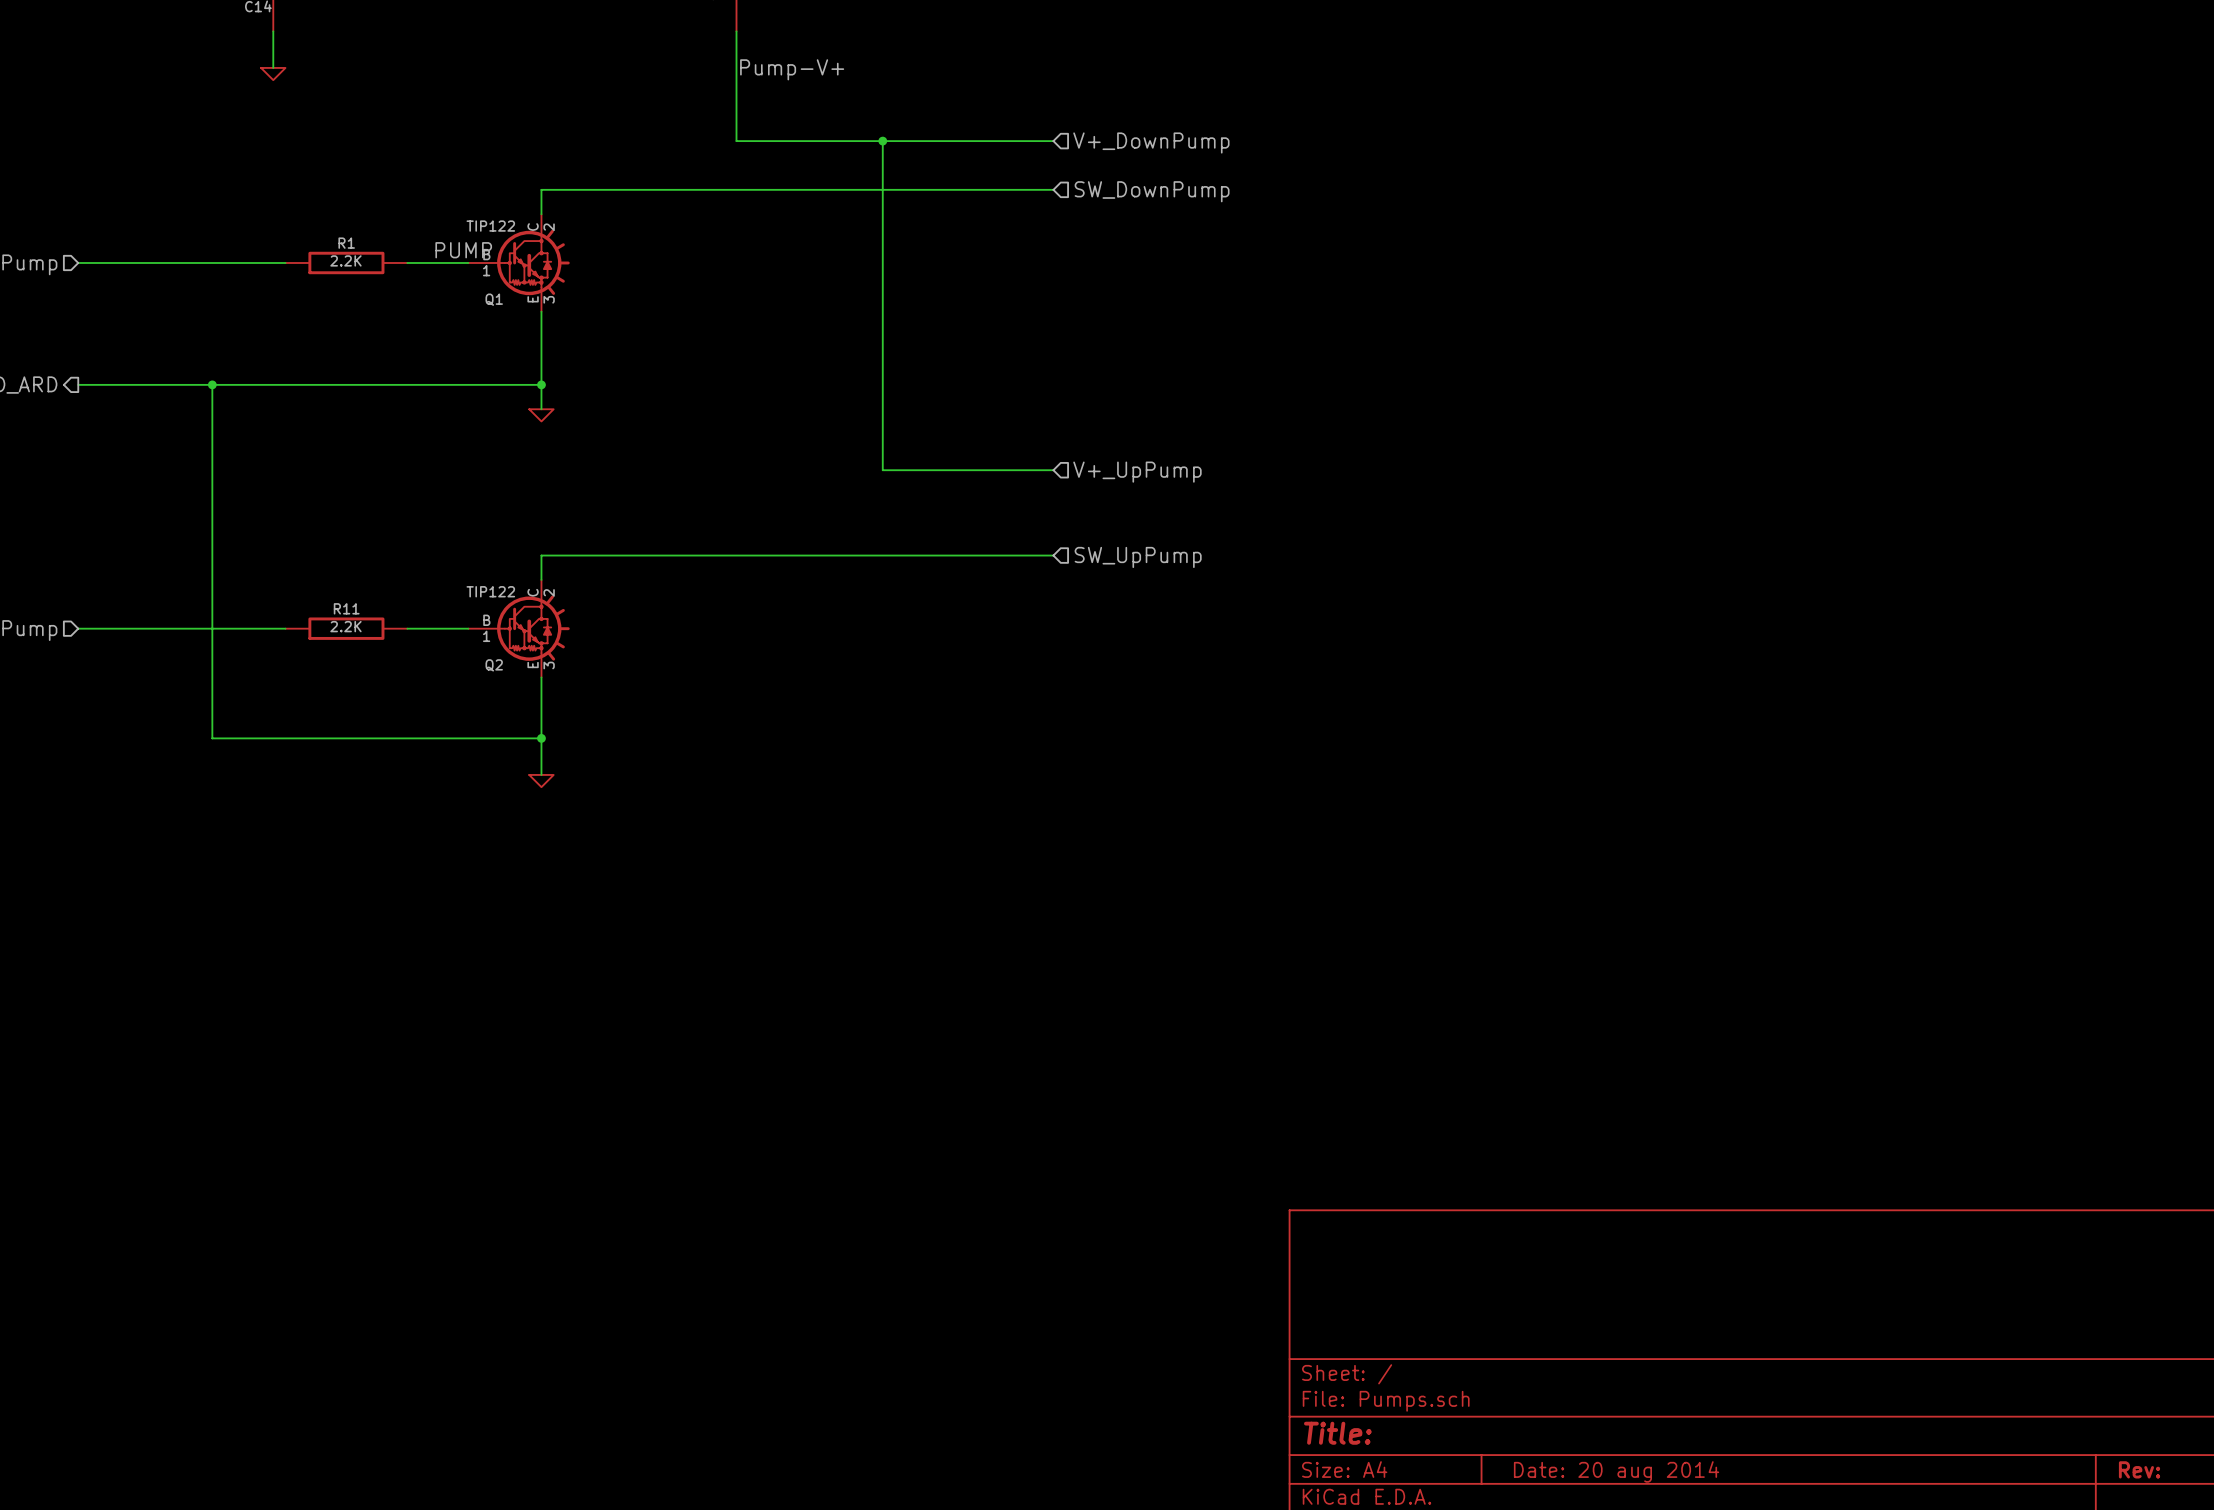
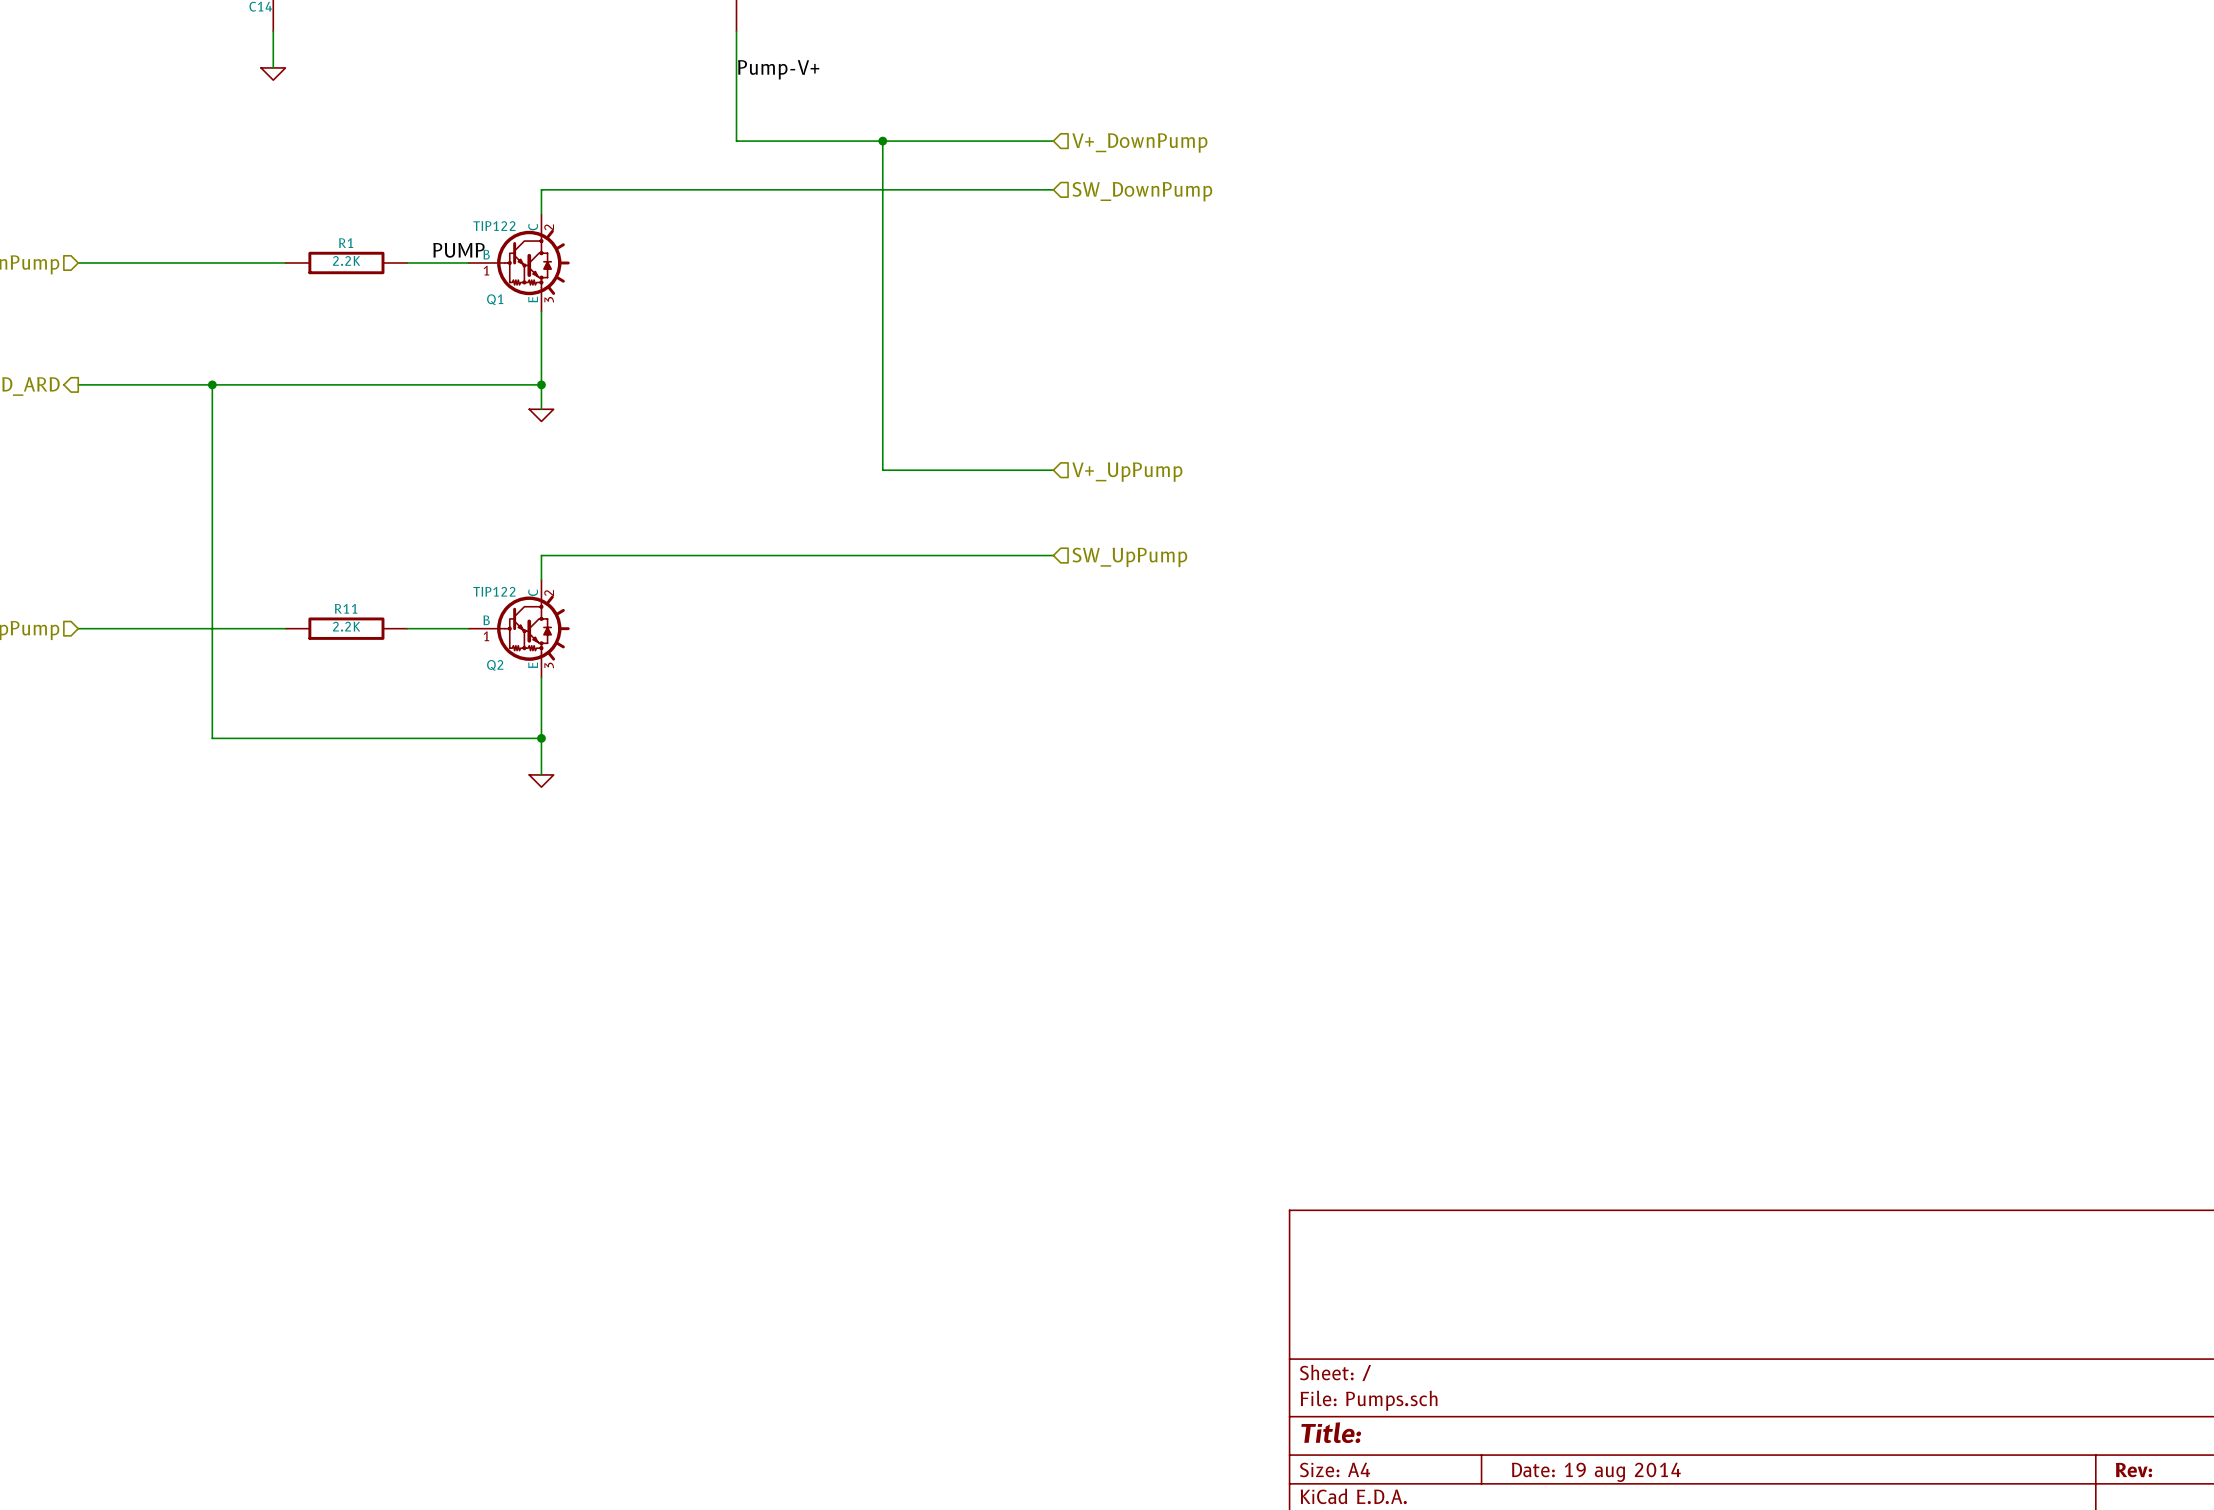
title block: Date: 20 aug 2014 (1616, 1471) -> Date: 19 aug 2014 (1596, 1472)

